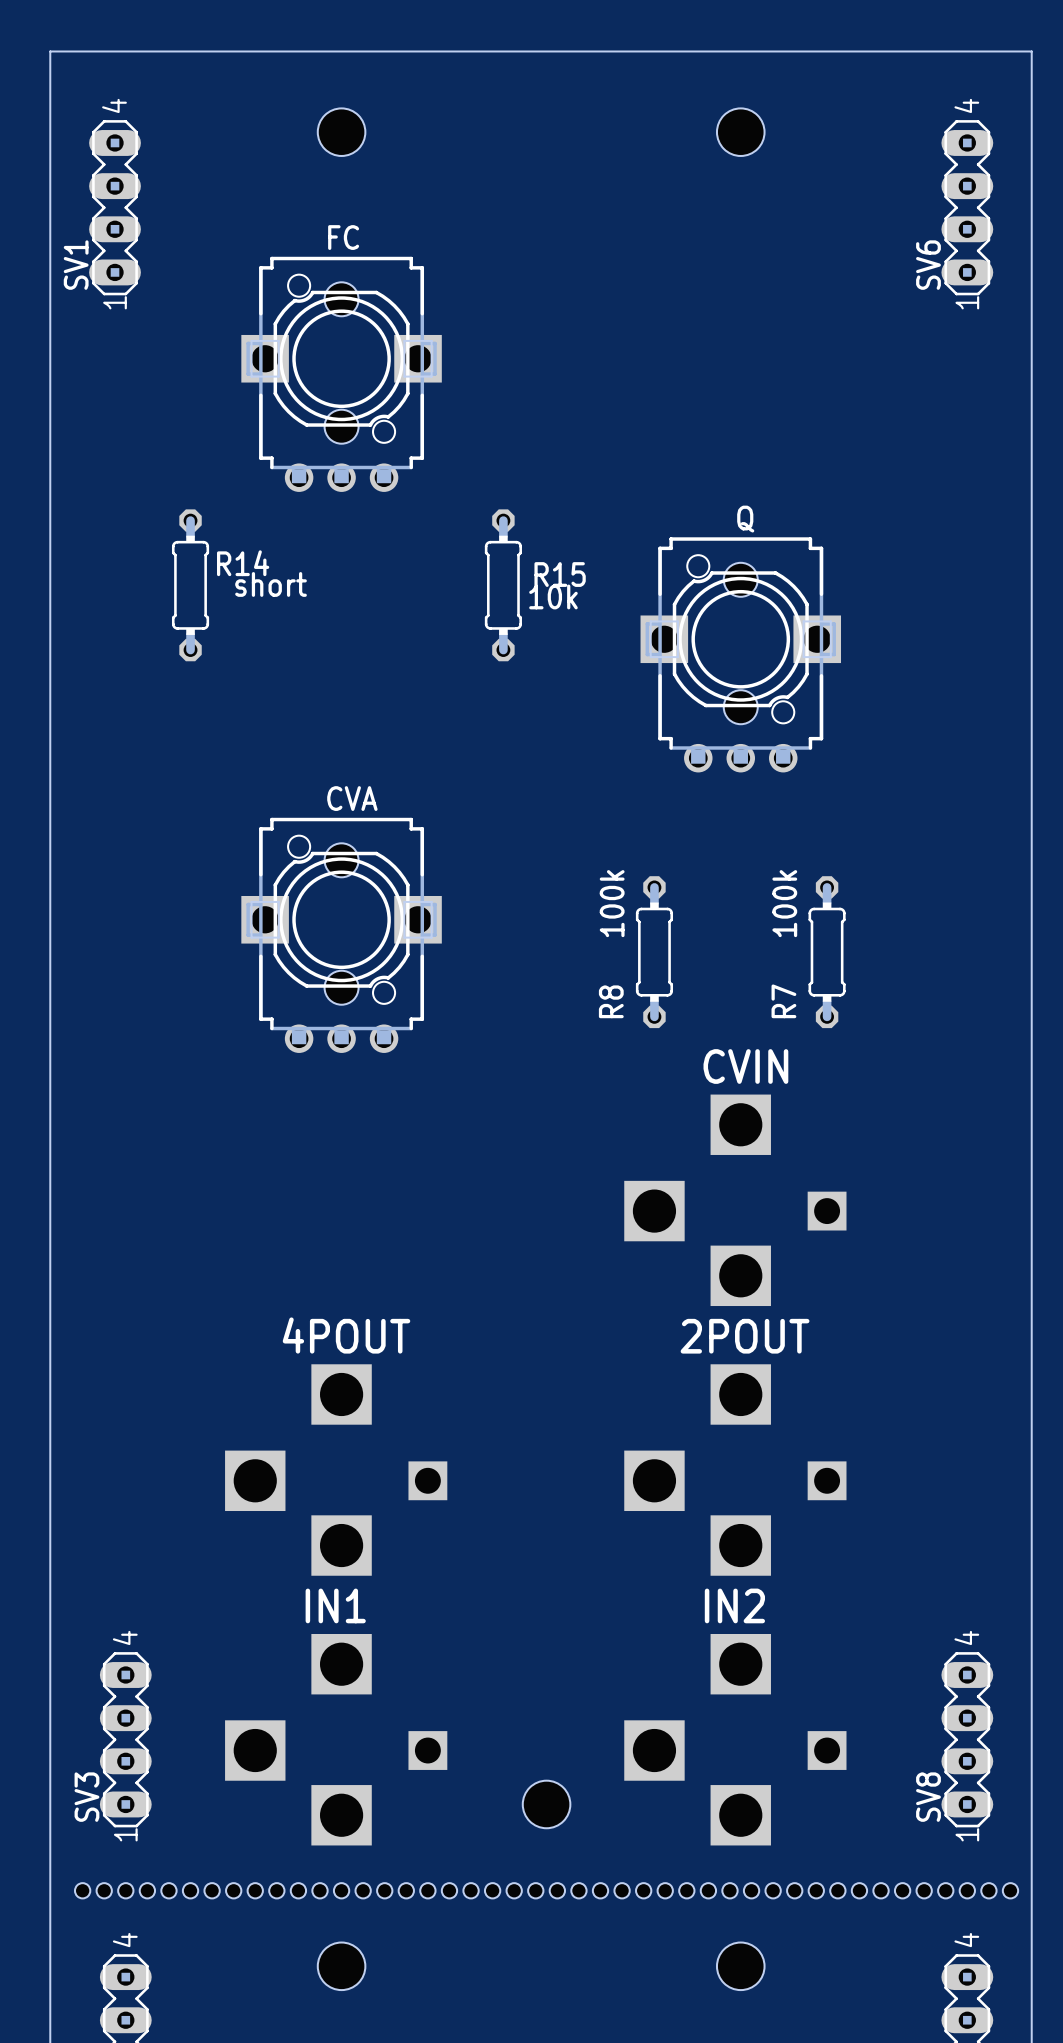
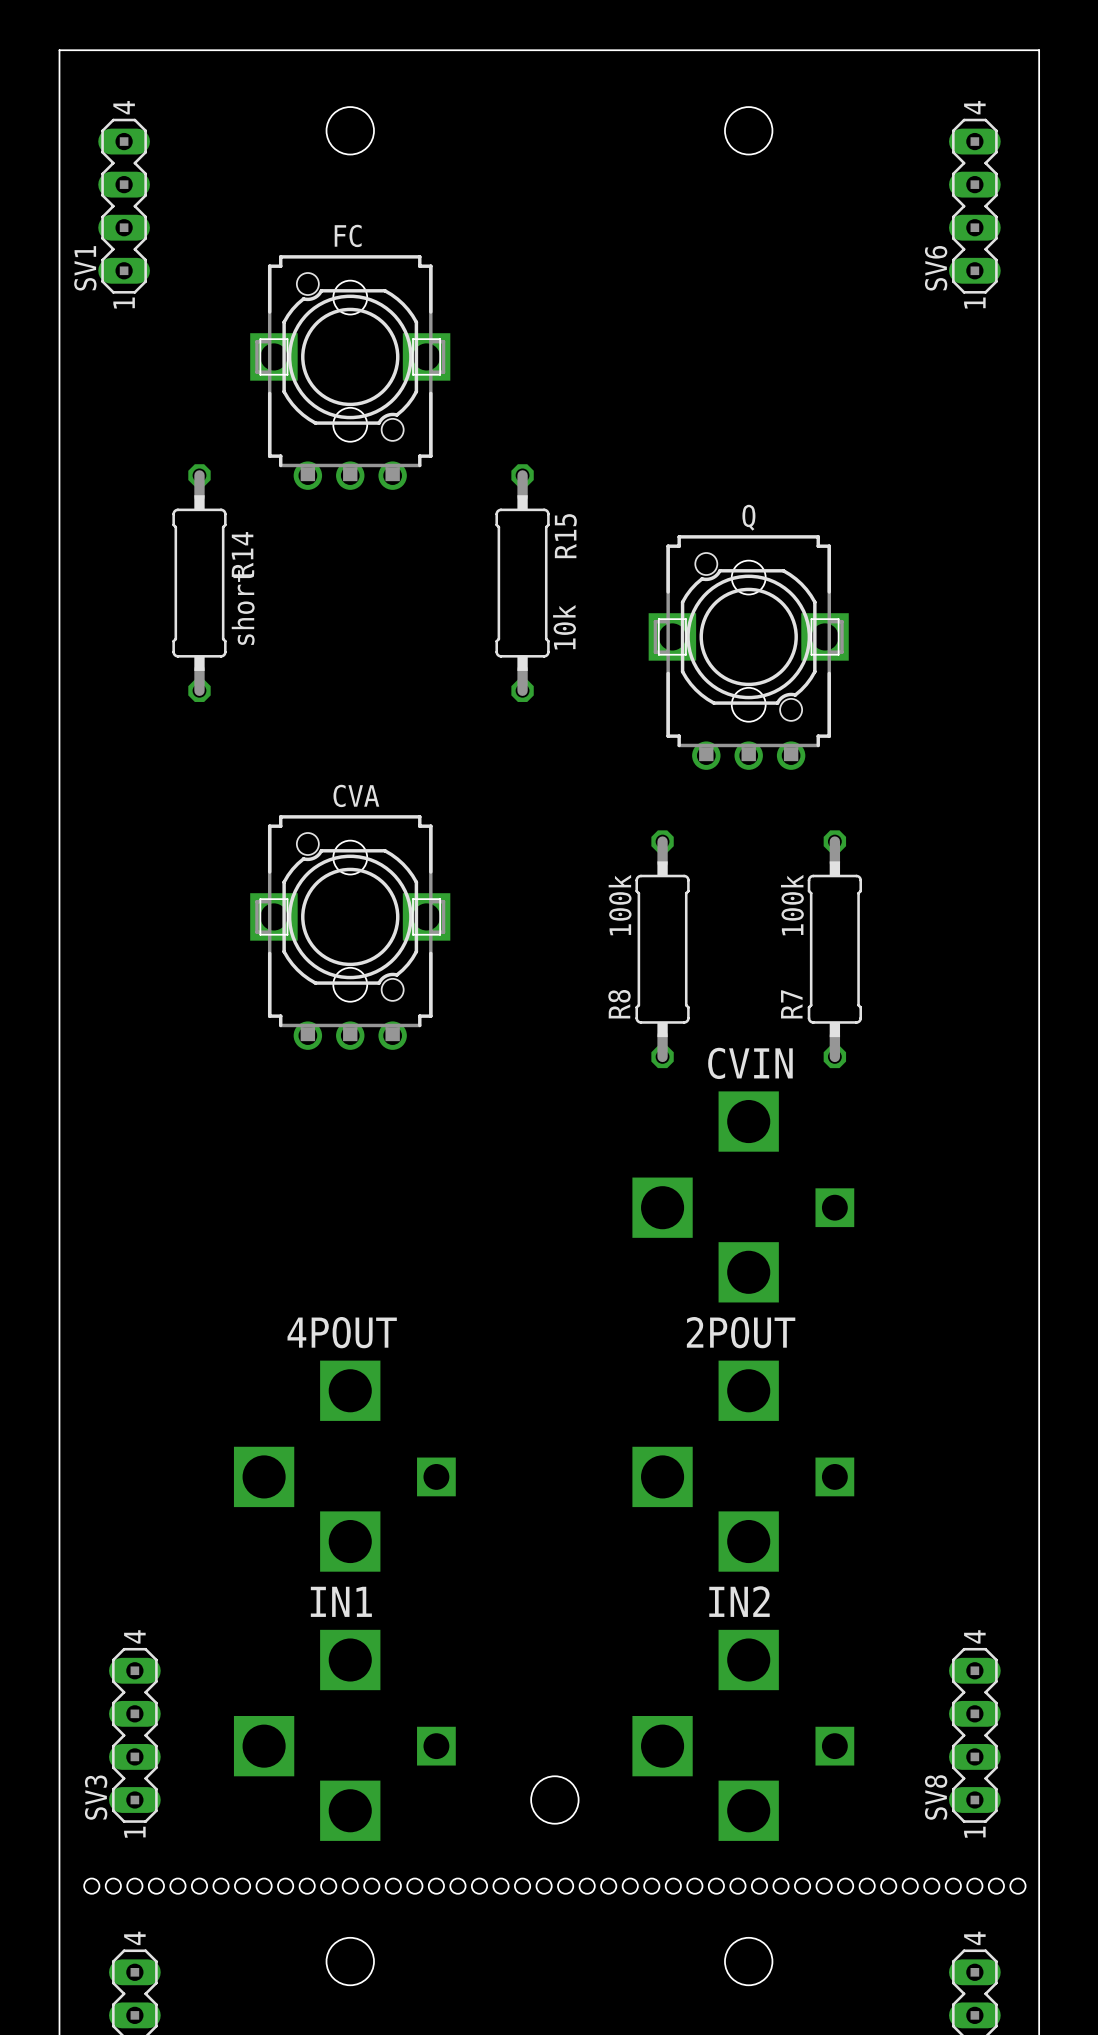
R14 footprint: [171, 509, 210, 662] -> [172, 464, 227, 702]
R15 footprint: [484, 509, 522, 662] -> [495, 464, 550, 702]
R15 value position: 10k (553, 596) -> 10k (564, 627)
R8 footprint: [635, 876, 674, 1029] -> [635, 830, 690, 1069]
R7 footprint: [808, 876, 846, 1029] -> [807, 830, 863, 1069]

